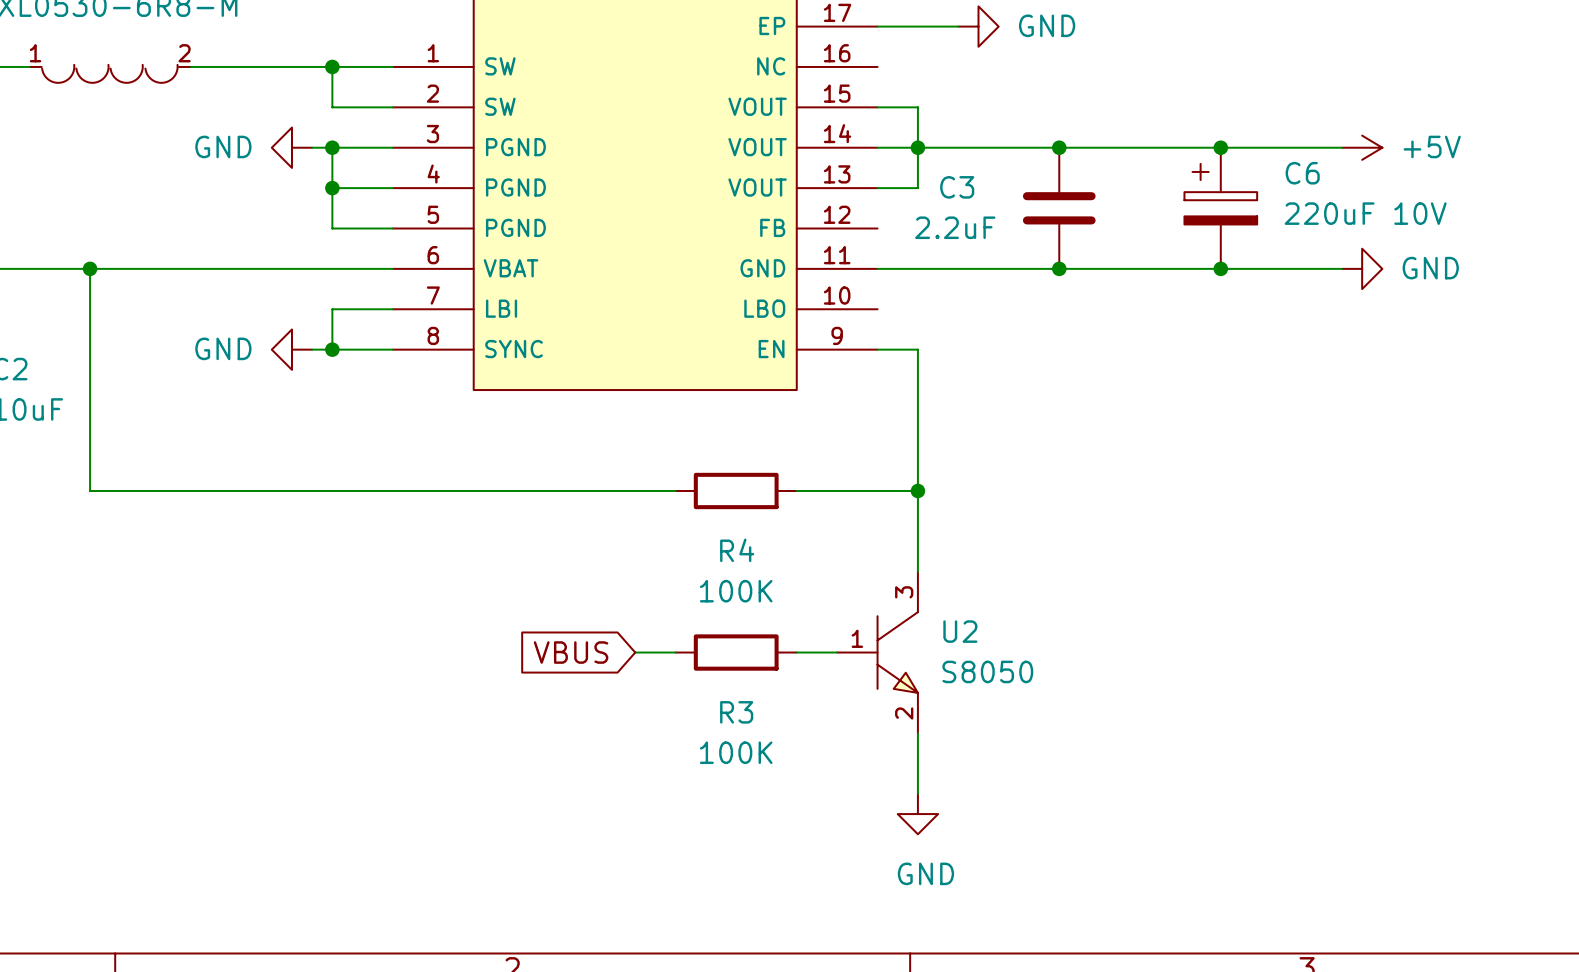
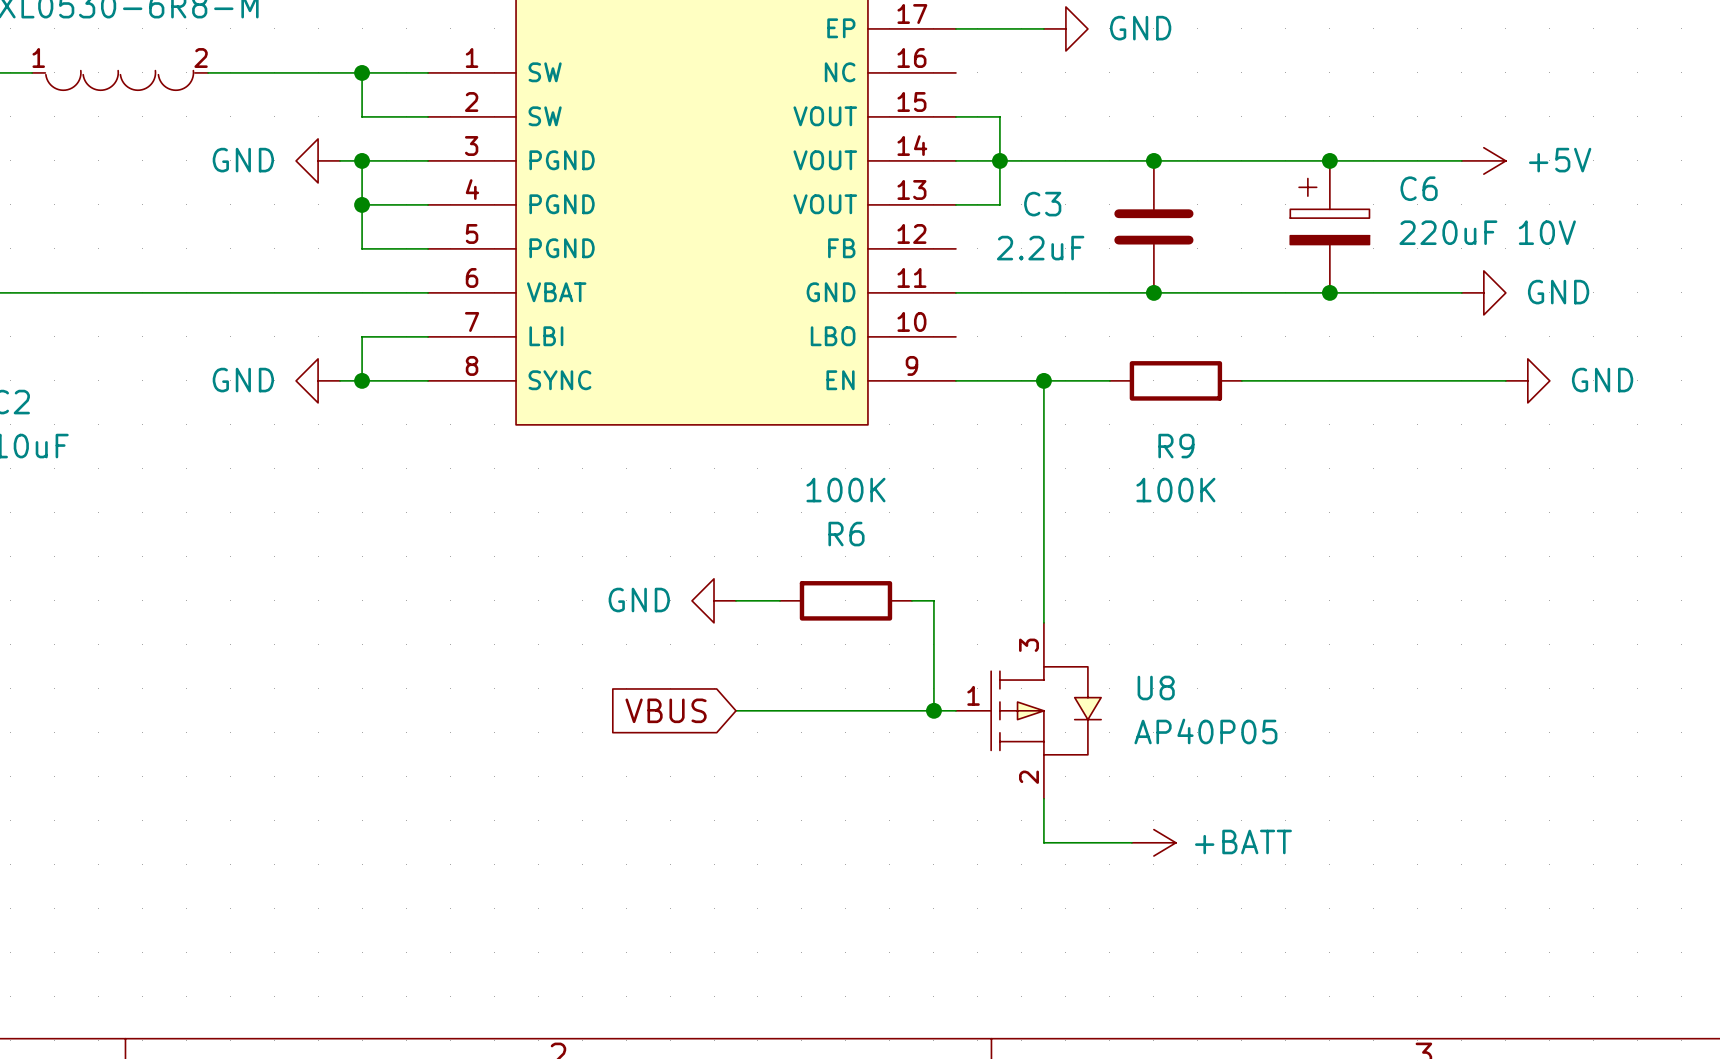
wire: (90, 268) (90, 490) (675, 490) -> none
junction: (90, 268) -> none
wire: (917, 349) (917, 571) -> (999, 380) (1109, 380)
wire: none -> (1043, 380) (1043, 622)
junction: none -> (1043, 380)
R9: none -> 100K (1175, 380)
wire: none -> (1241, 380) (1505, 380)
power symbol: none -> GND (1527, 380)
R4: 100K (736, 490) -> none
wire: (796, 490) (917, 490) -> none
junction: (917, 490) -> none
power symbol: none -> GND (714, 600)
wire: none -> (735, 600) (779, 600)
R6: none -> 100K (845, 600)
wire: none -> (911, 600) (933, 600) (933, 710)
global label position: VBUS (571, 652) -> VBUS (666, 710)
wire: (635, 652) (675, 652) -> (867, 710) (735, 710)
R3: 100K (736, 652) -> none
junction: none -> (933, 710)
U2: S8050 (877, 652) -> none
U8: none -> AP40P05 (1028, 710)
wire: (917, 733) (917, 793) -> none
wire: none -> (1043, 798) (1043, 842) (1131, 842)
power symbol: none -> +BATT (1153, 842)
power symbol: GND (917, 814) -> none

